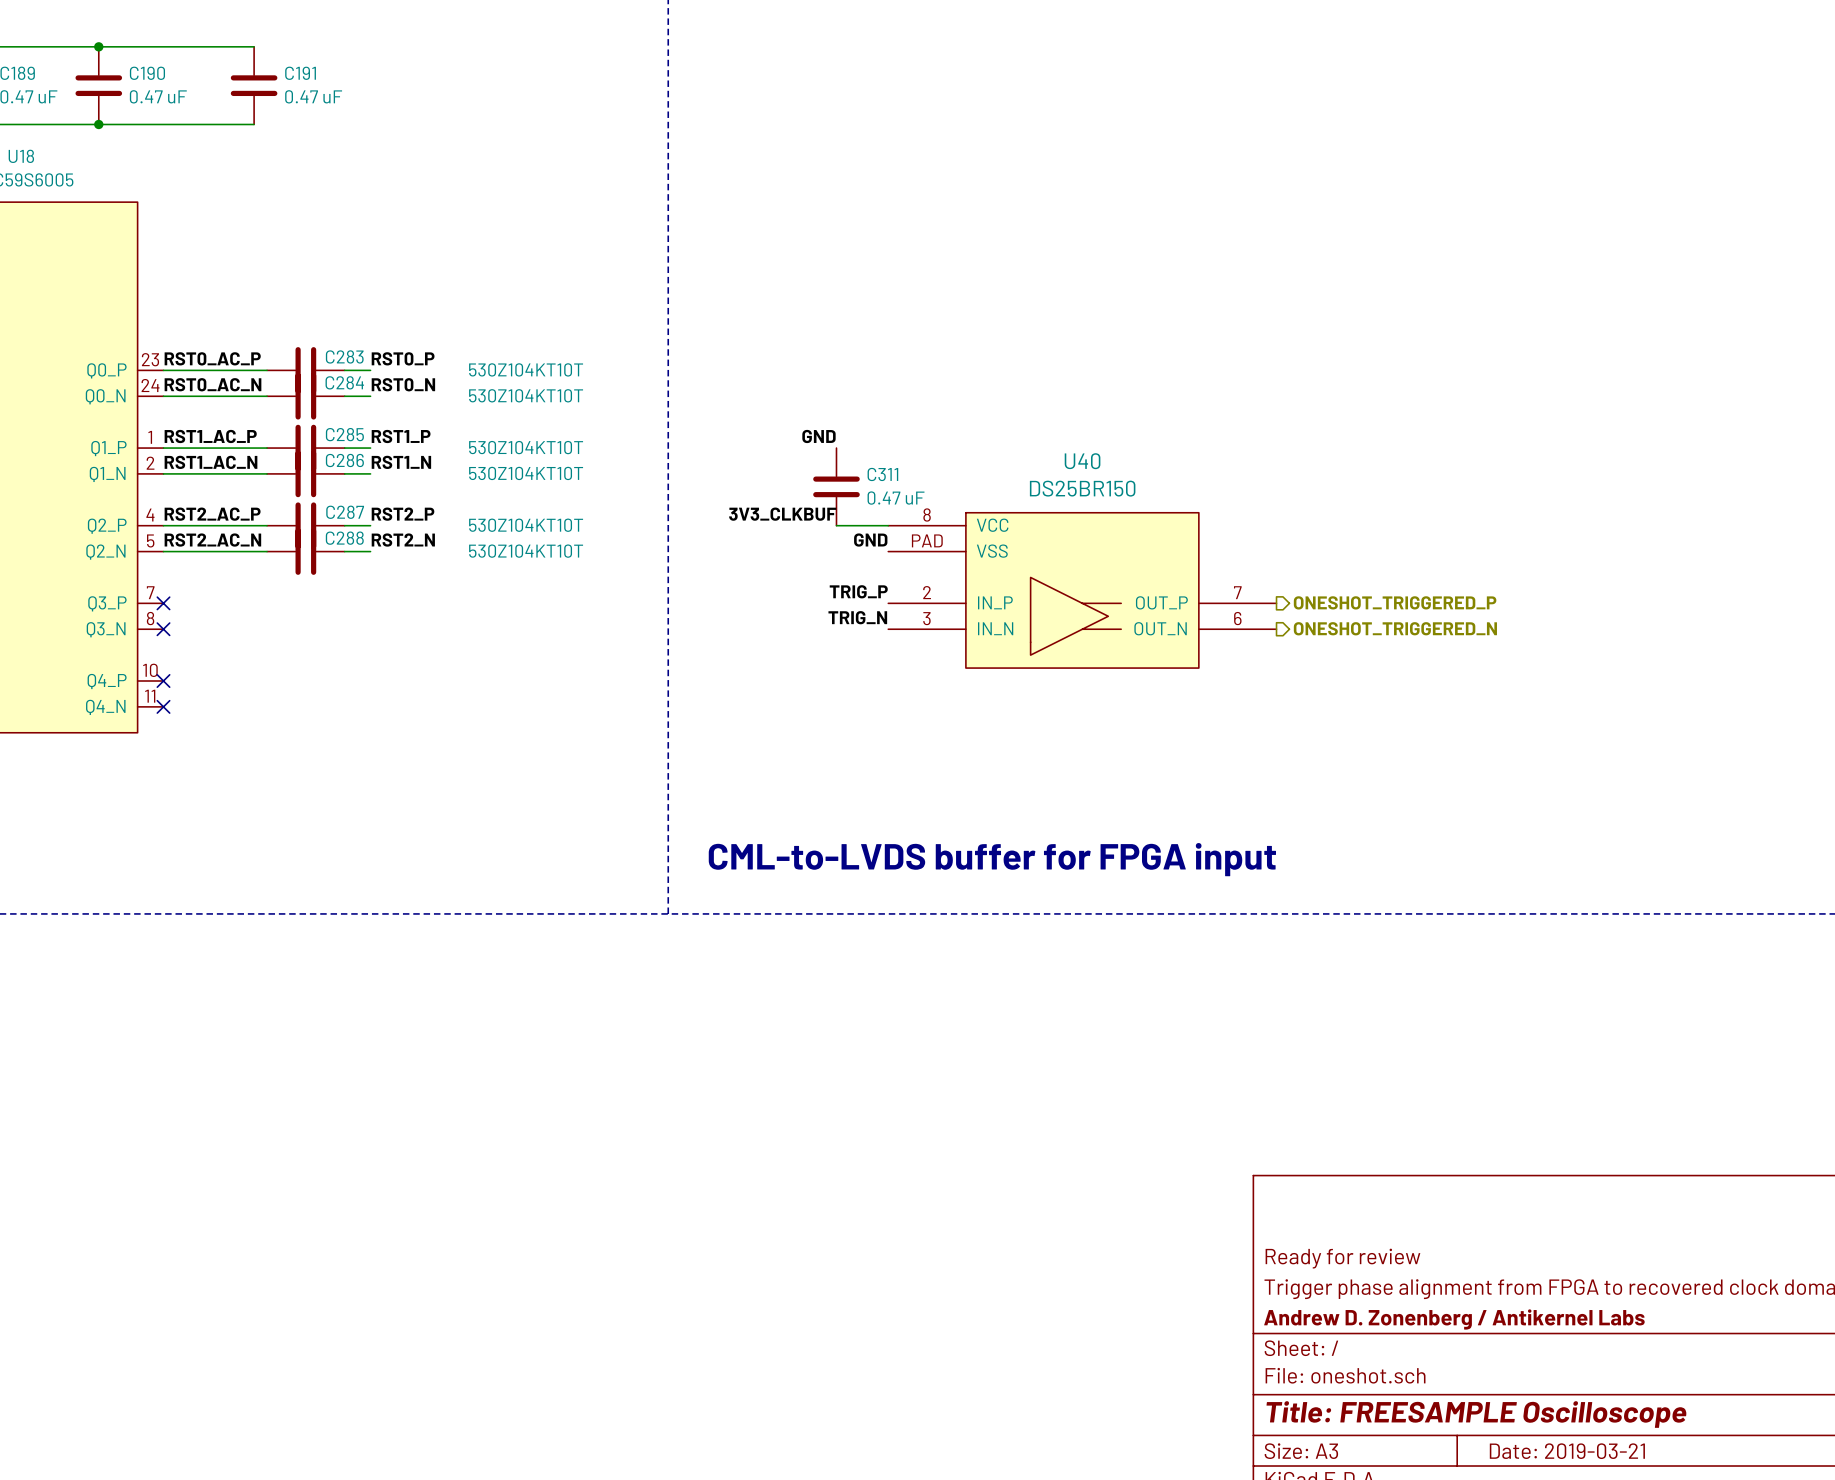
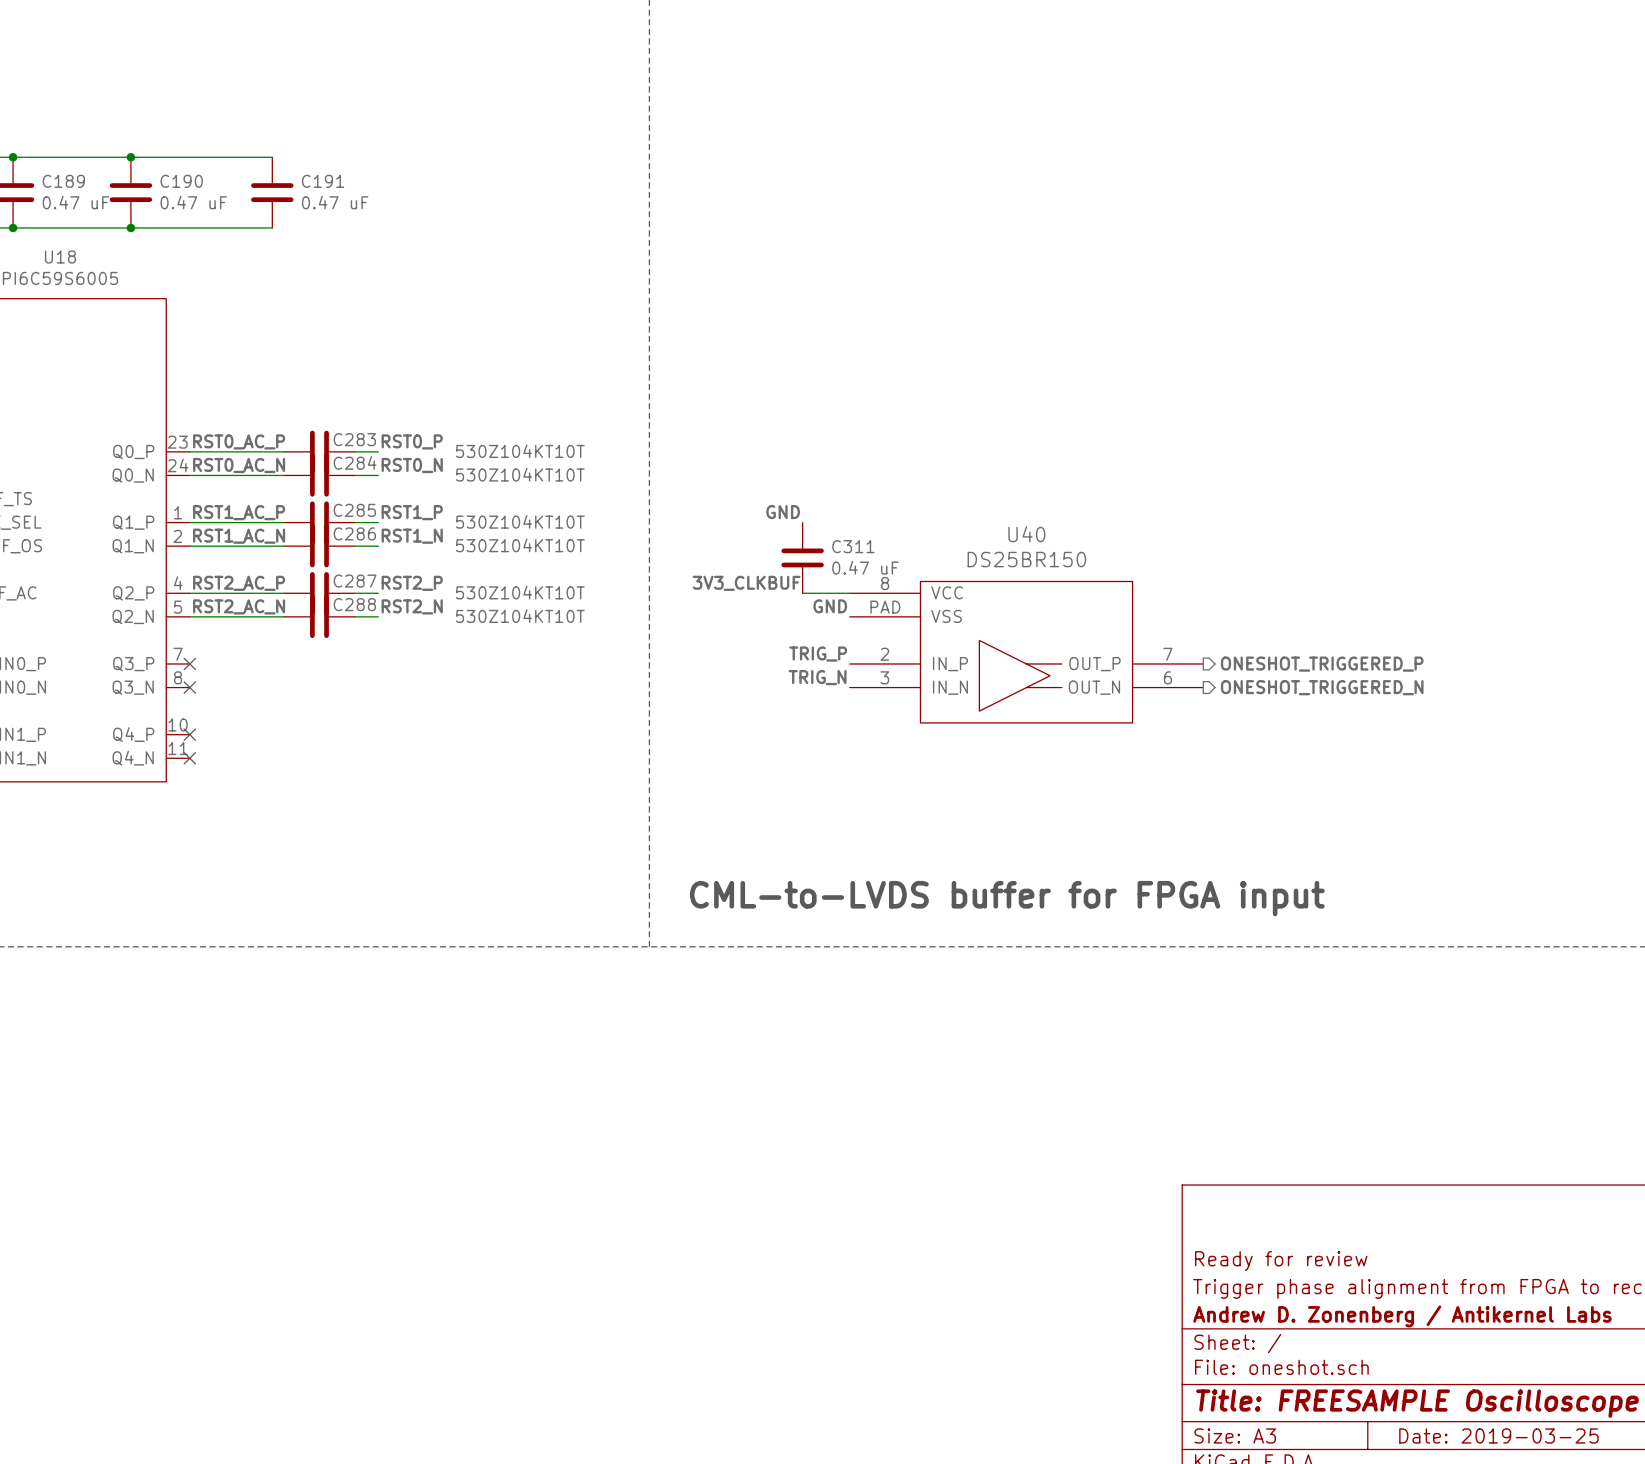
title block: Date: 2019-03-21 (1567, 1451) -> Date: 2019-03-25 (1498, 1435)

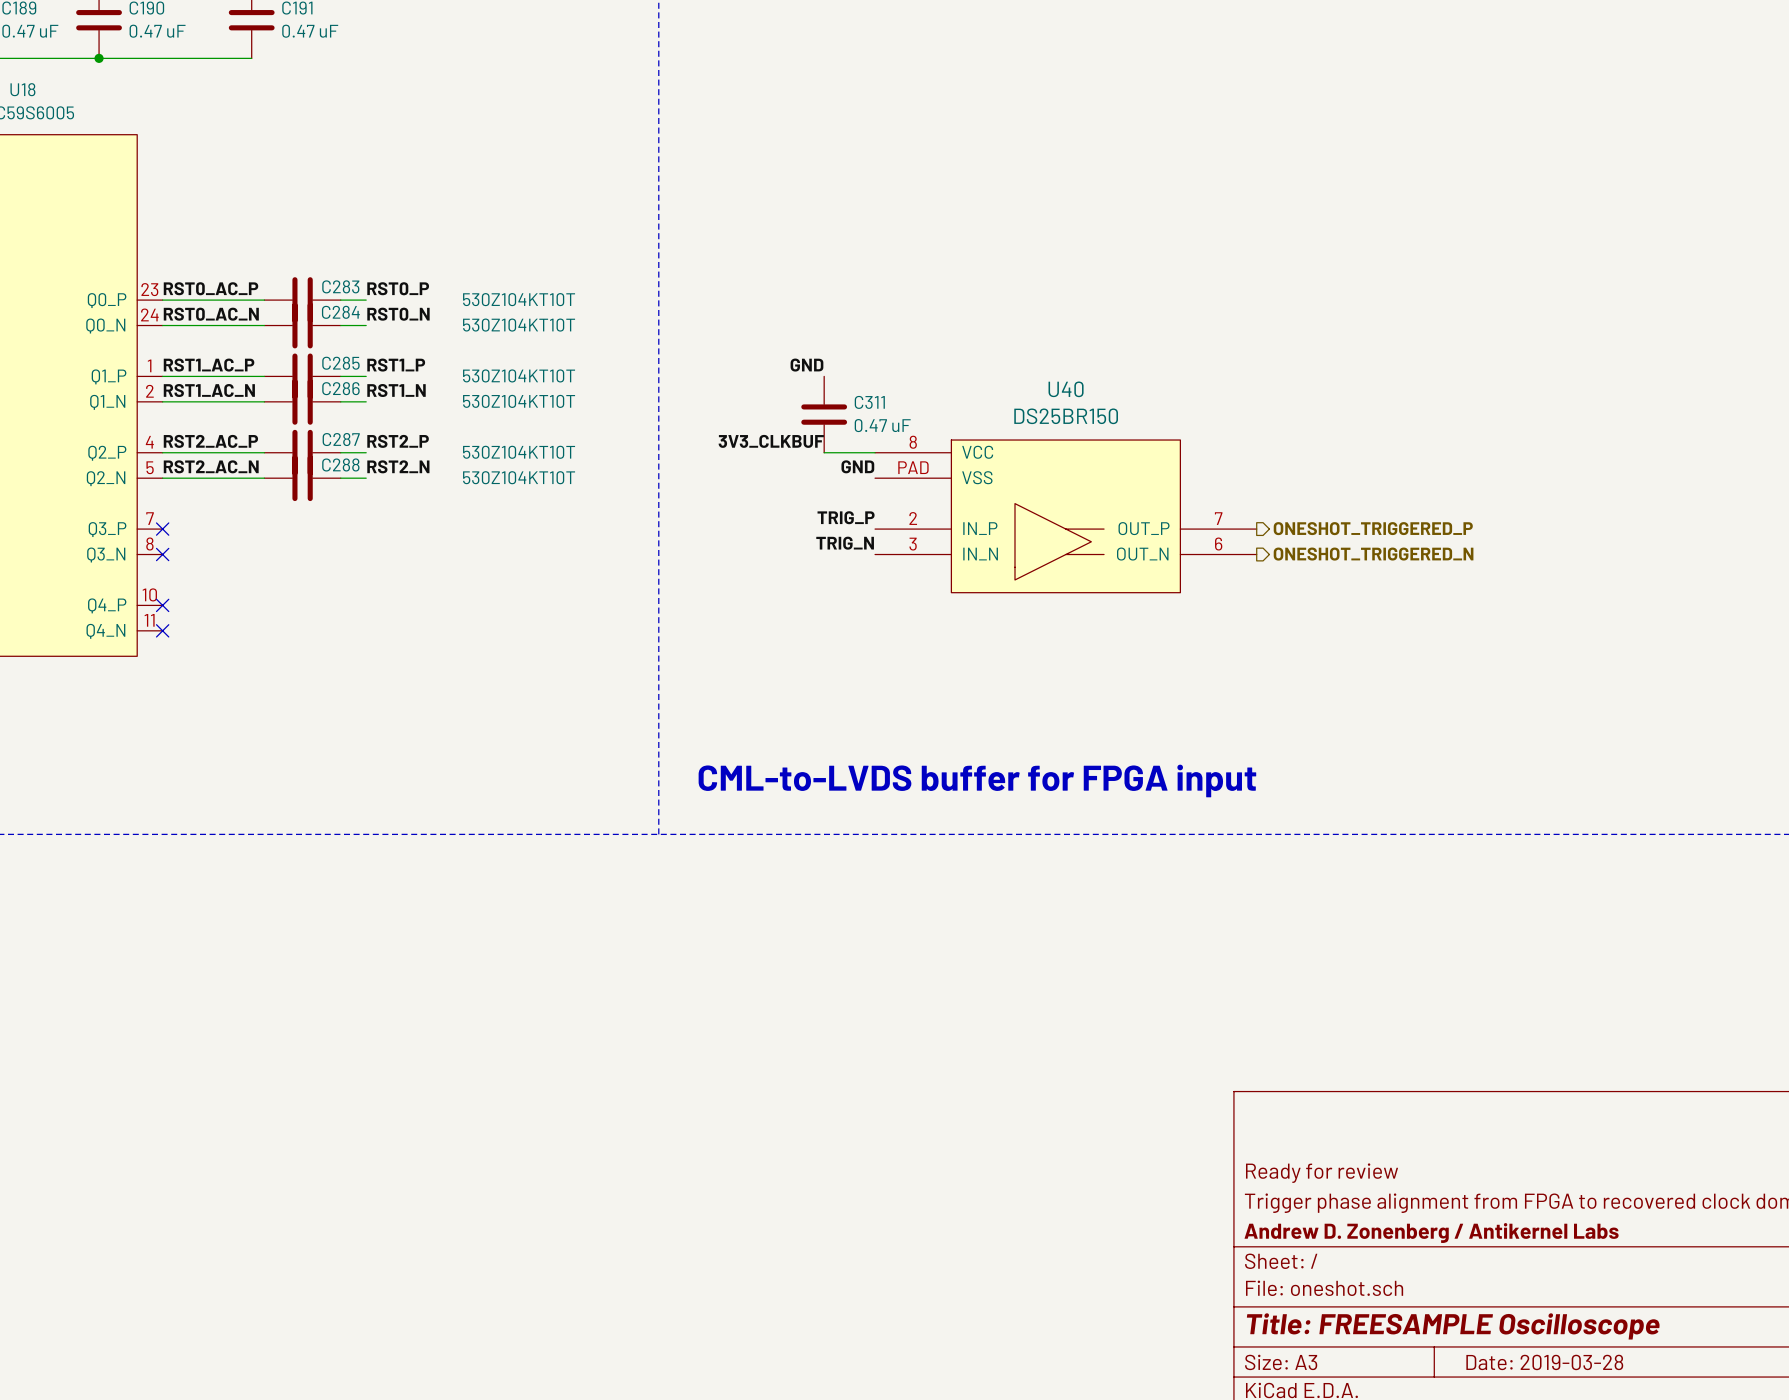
title block: Date: 2019-03-25 (1498, 1435) -> Date: 2019-03-28 (1544, 1362)

